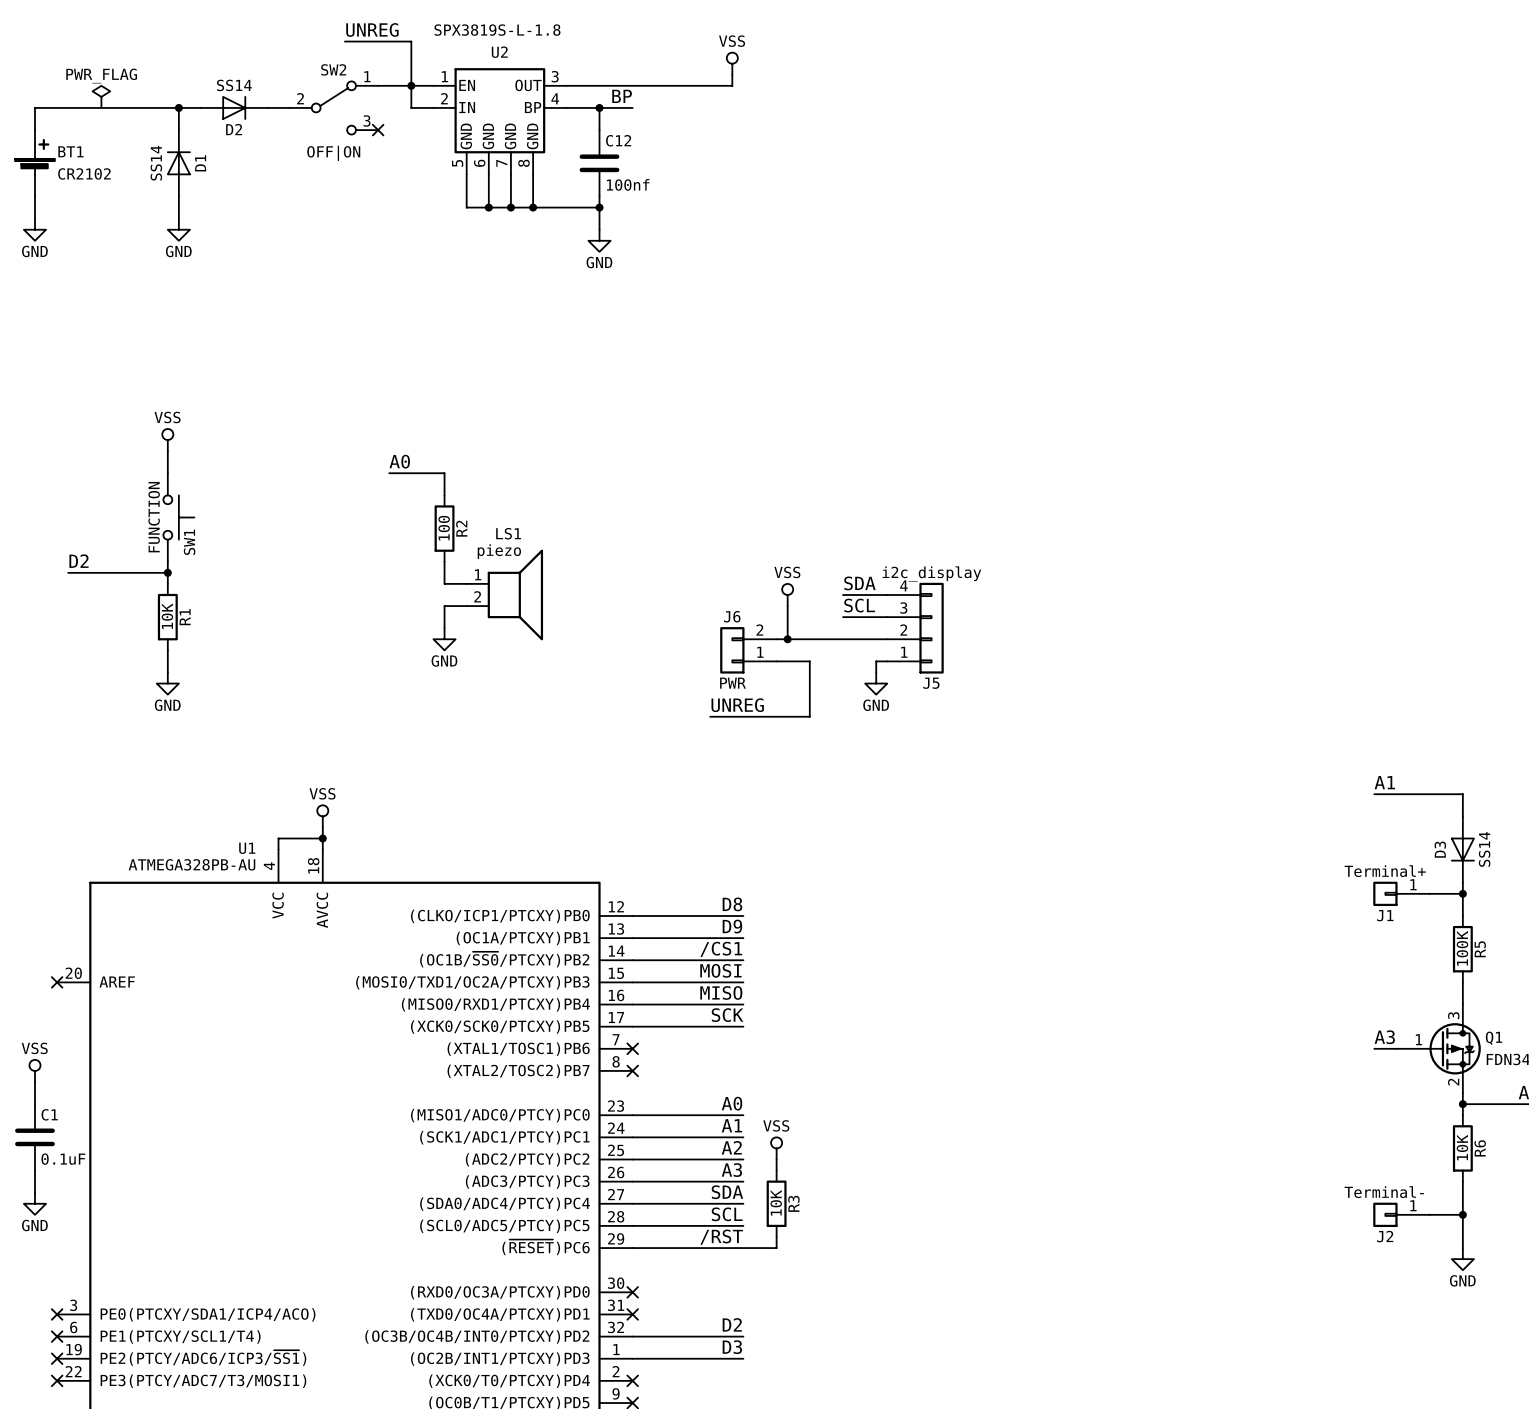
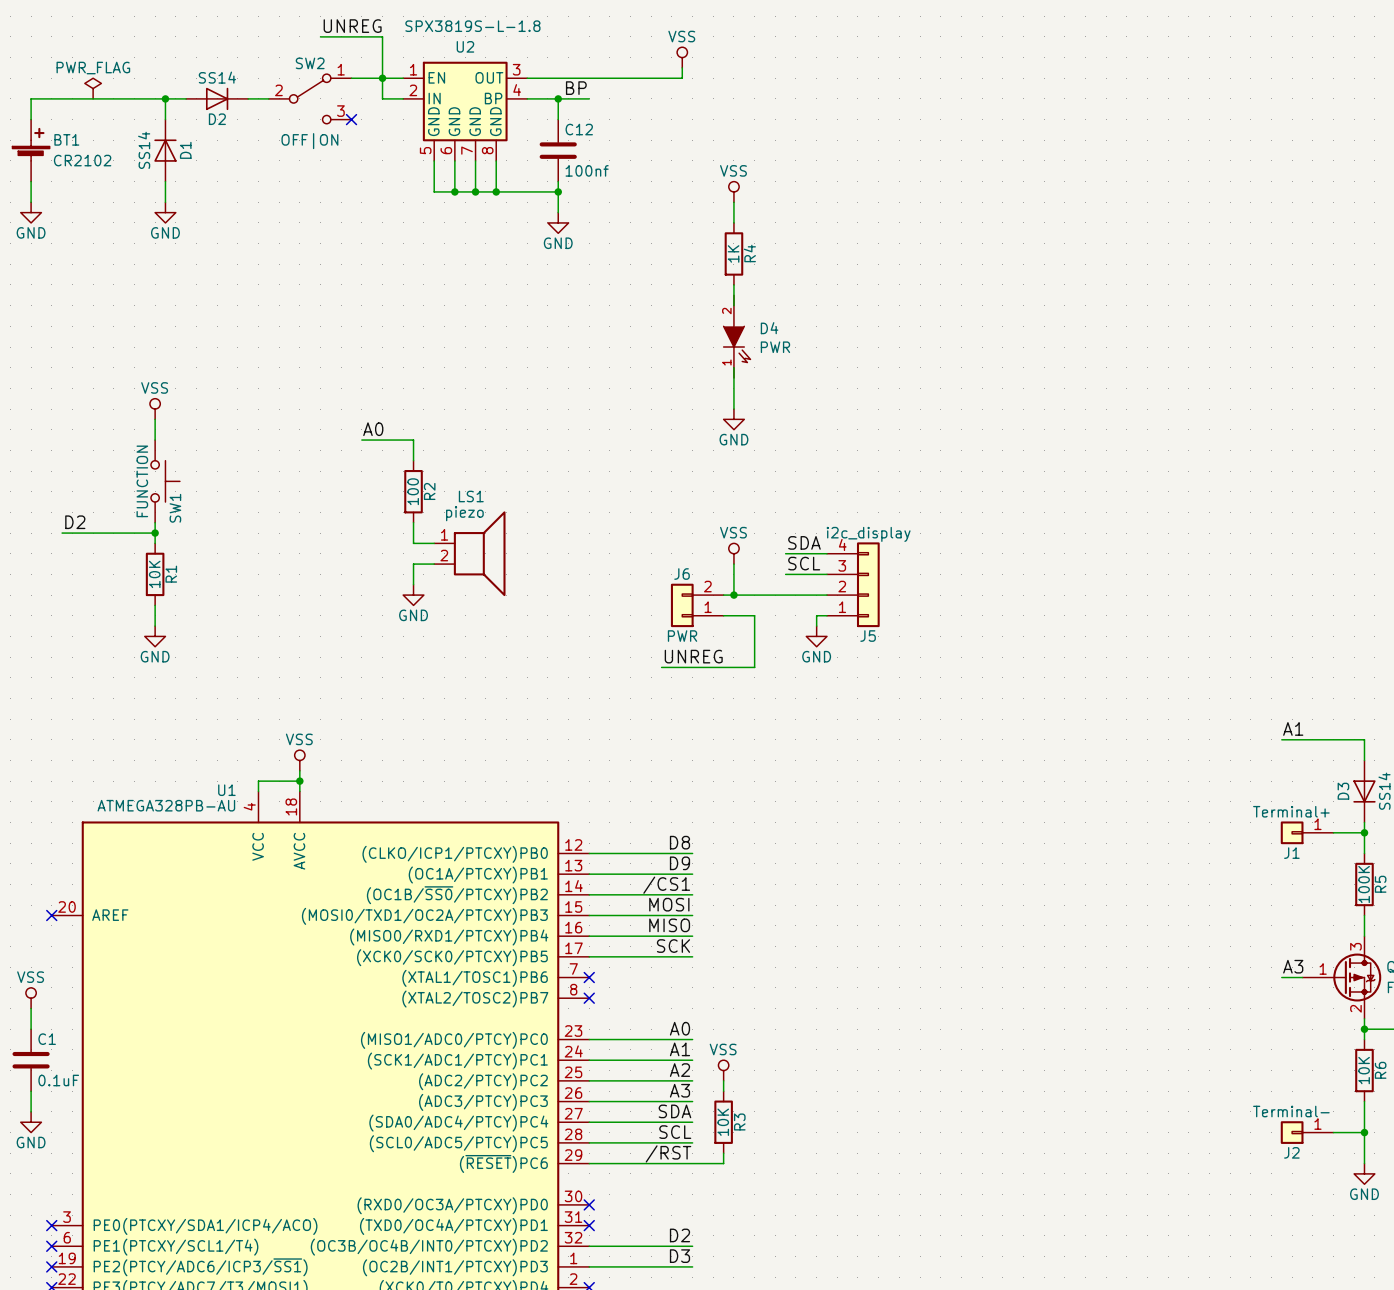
power symbol: none -> VSS (733, 191)
wire: none -> (733, 202) (733, 222)
R4: none -> 1K (733, 253)
wire: none -> (733, 284) (733, 305)
D4: none -> PWR (737, 336)
wire: none -> (733, 367) (733, 409)
power symbol: none -> GND (733, 419)

